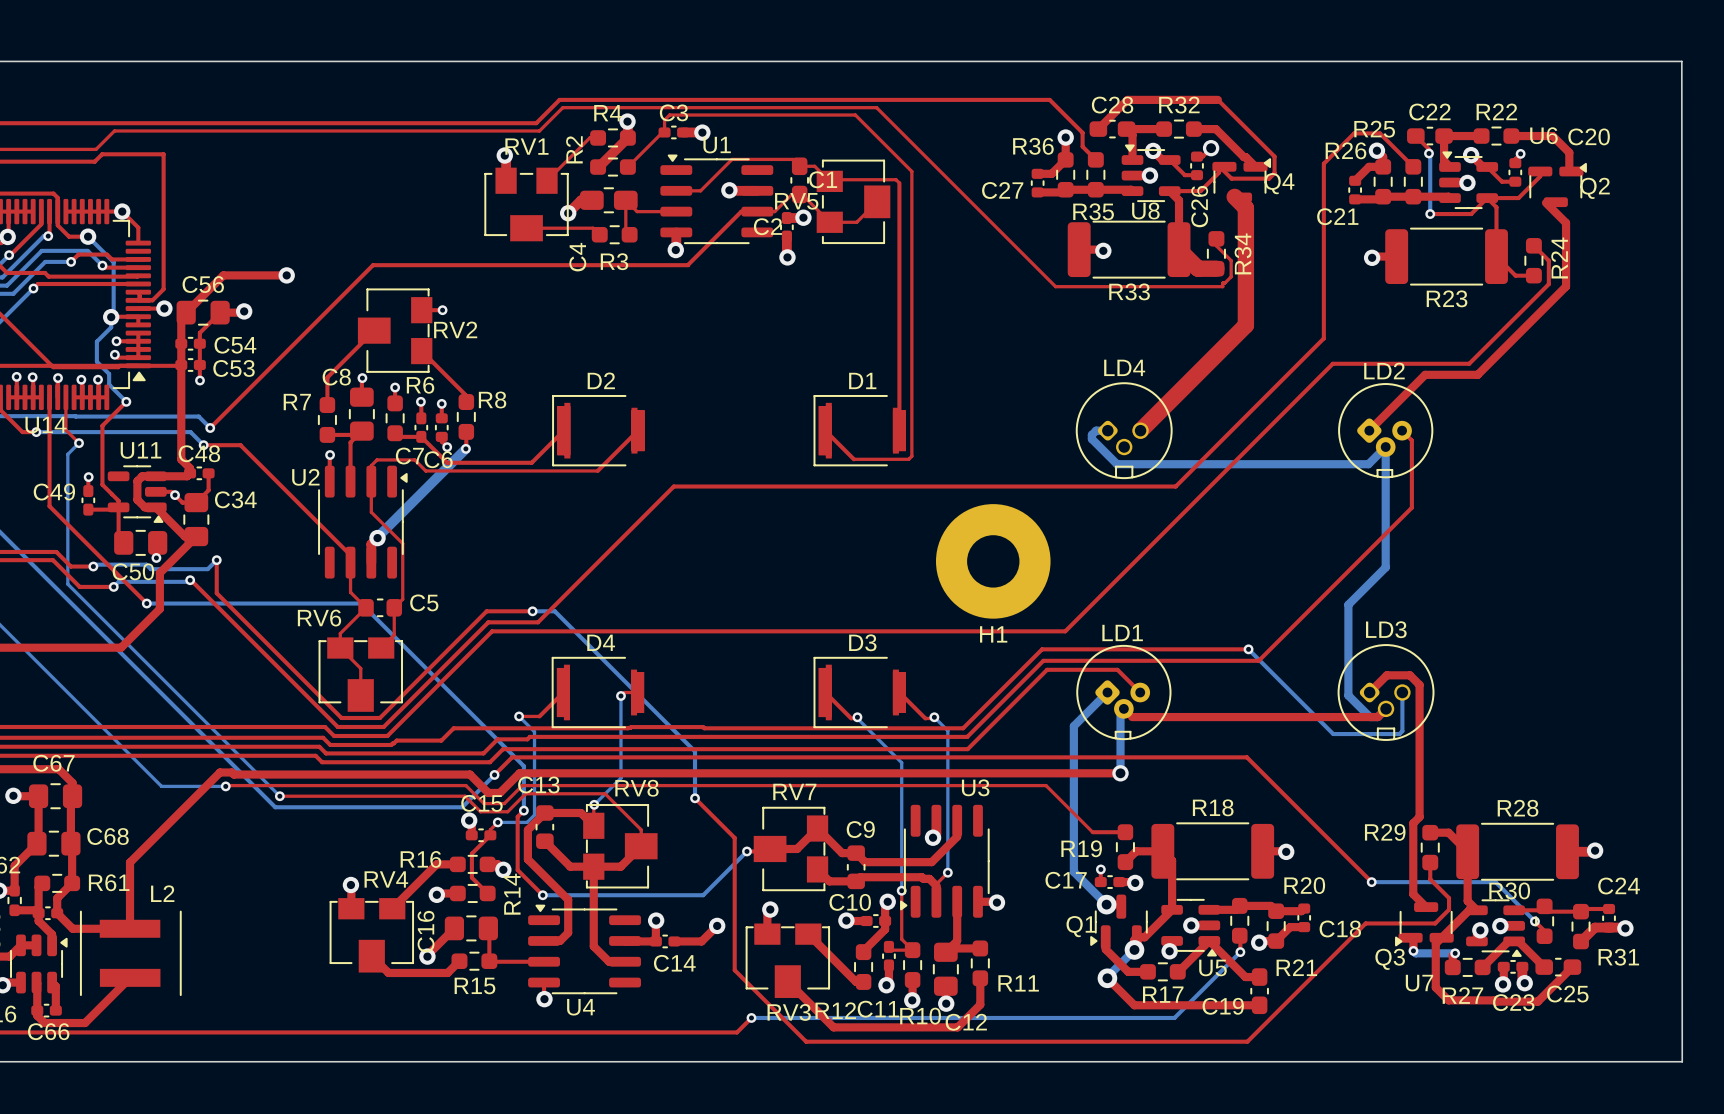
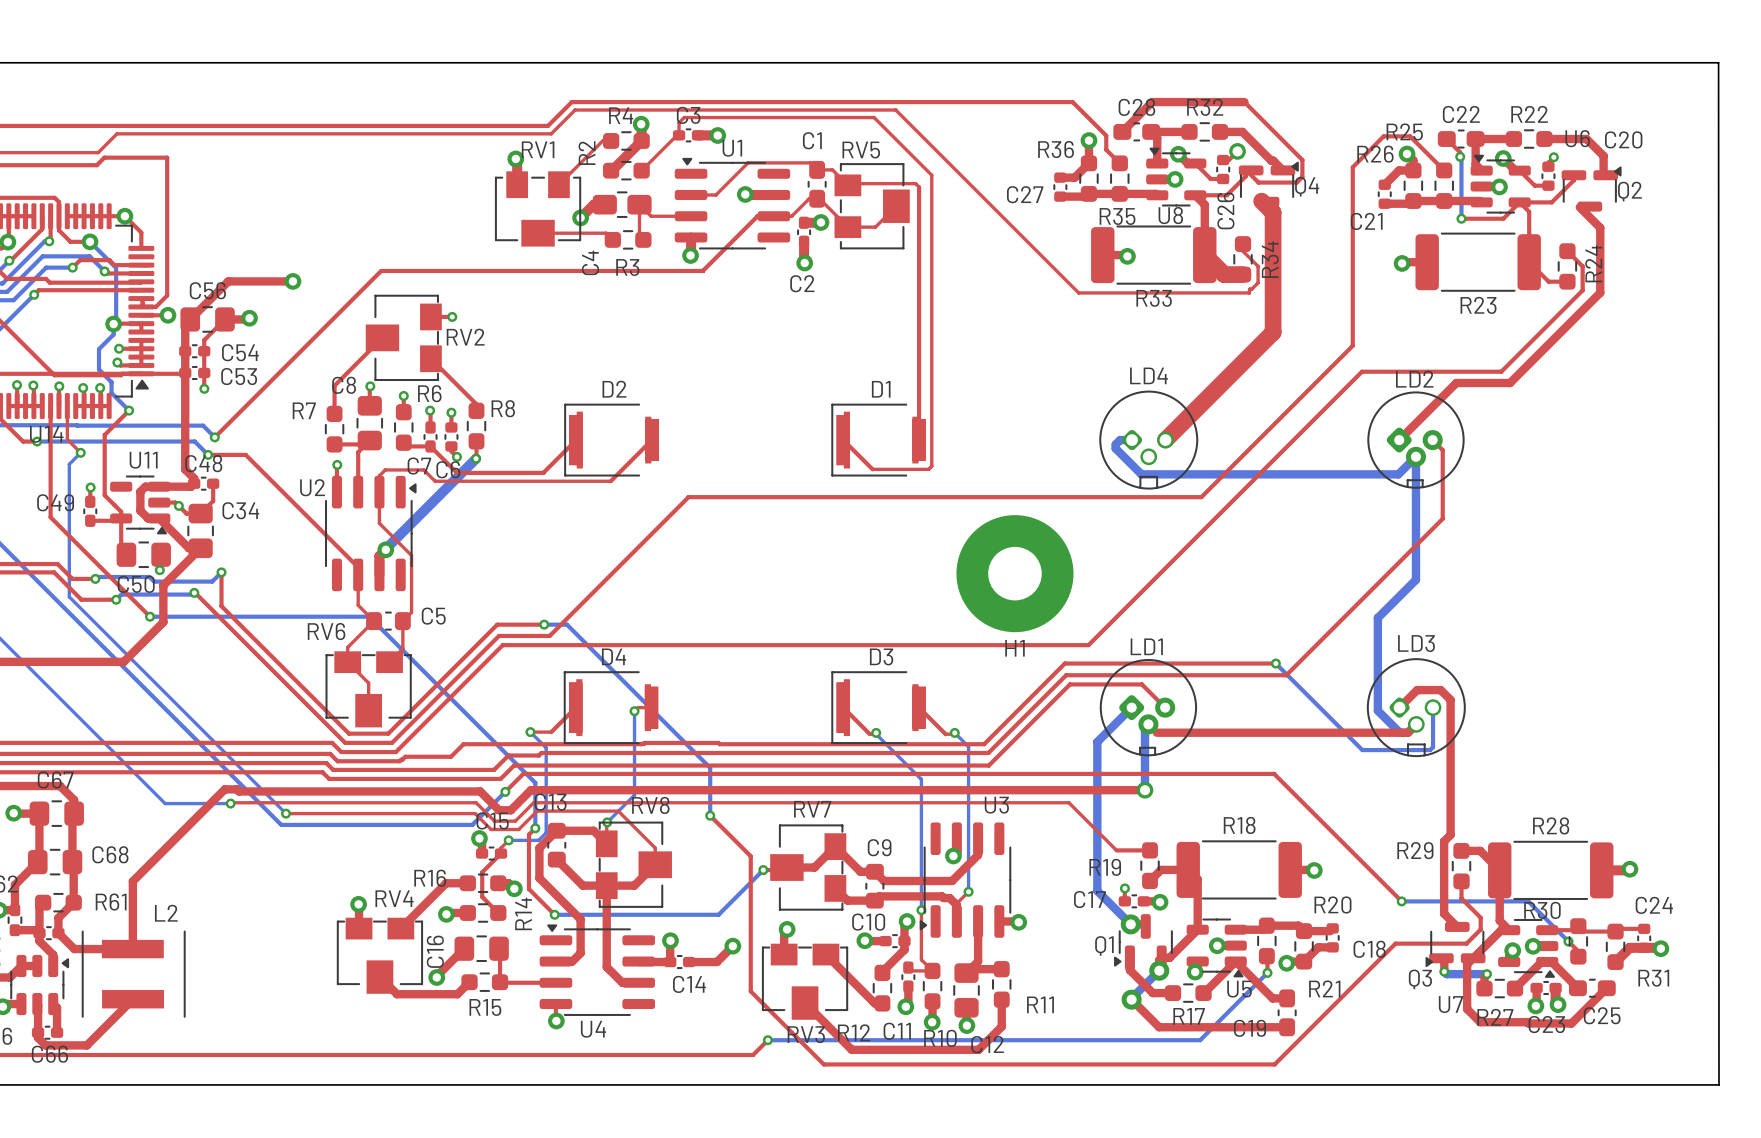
C1 name position: C1 (823, 179) -> C1 (812, 140)
RV5 name position: RV5 (796, 201) -> RV5 (861, 150)
C2 name position: C2 (767, 226) -> C2 (802, 283)

